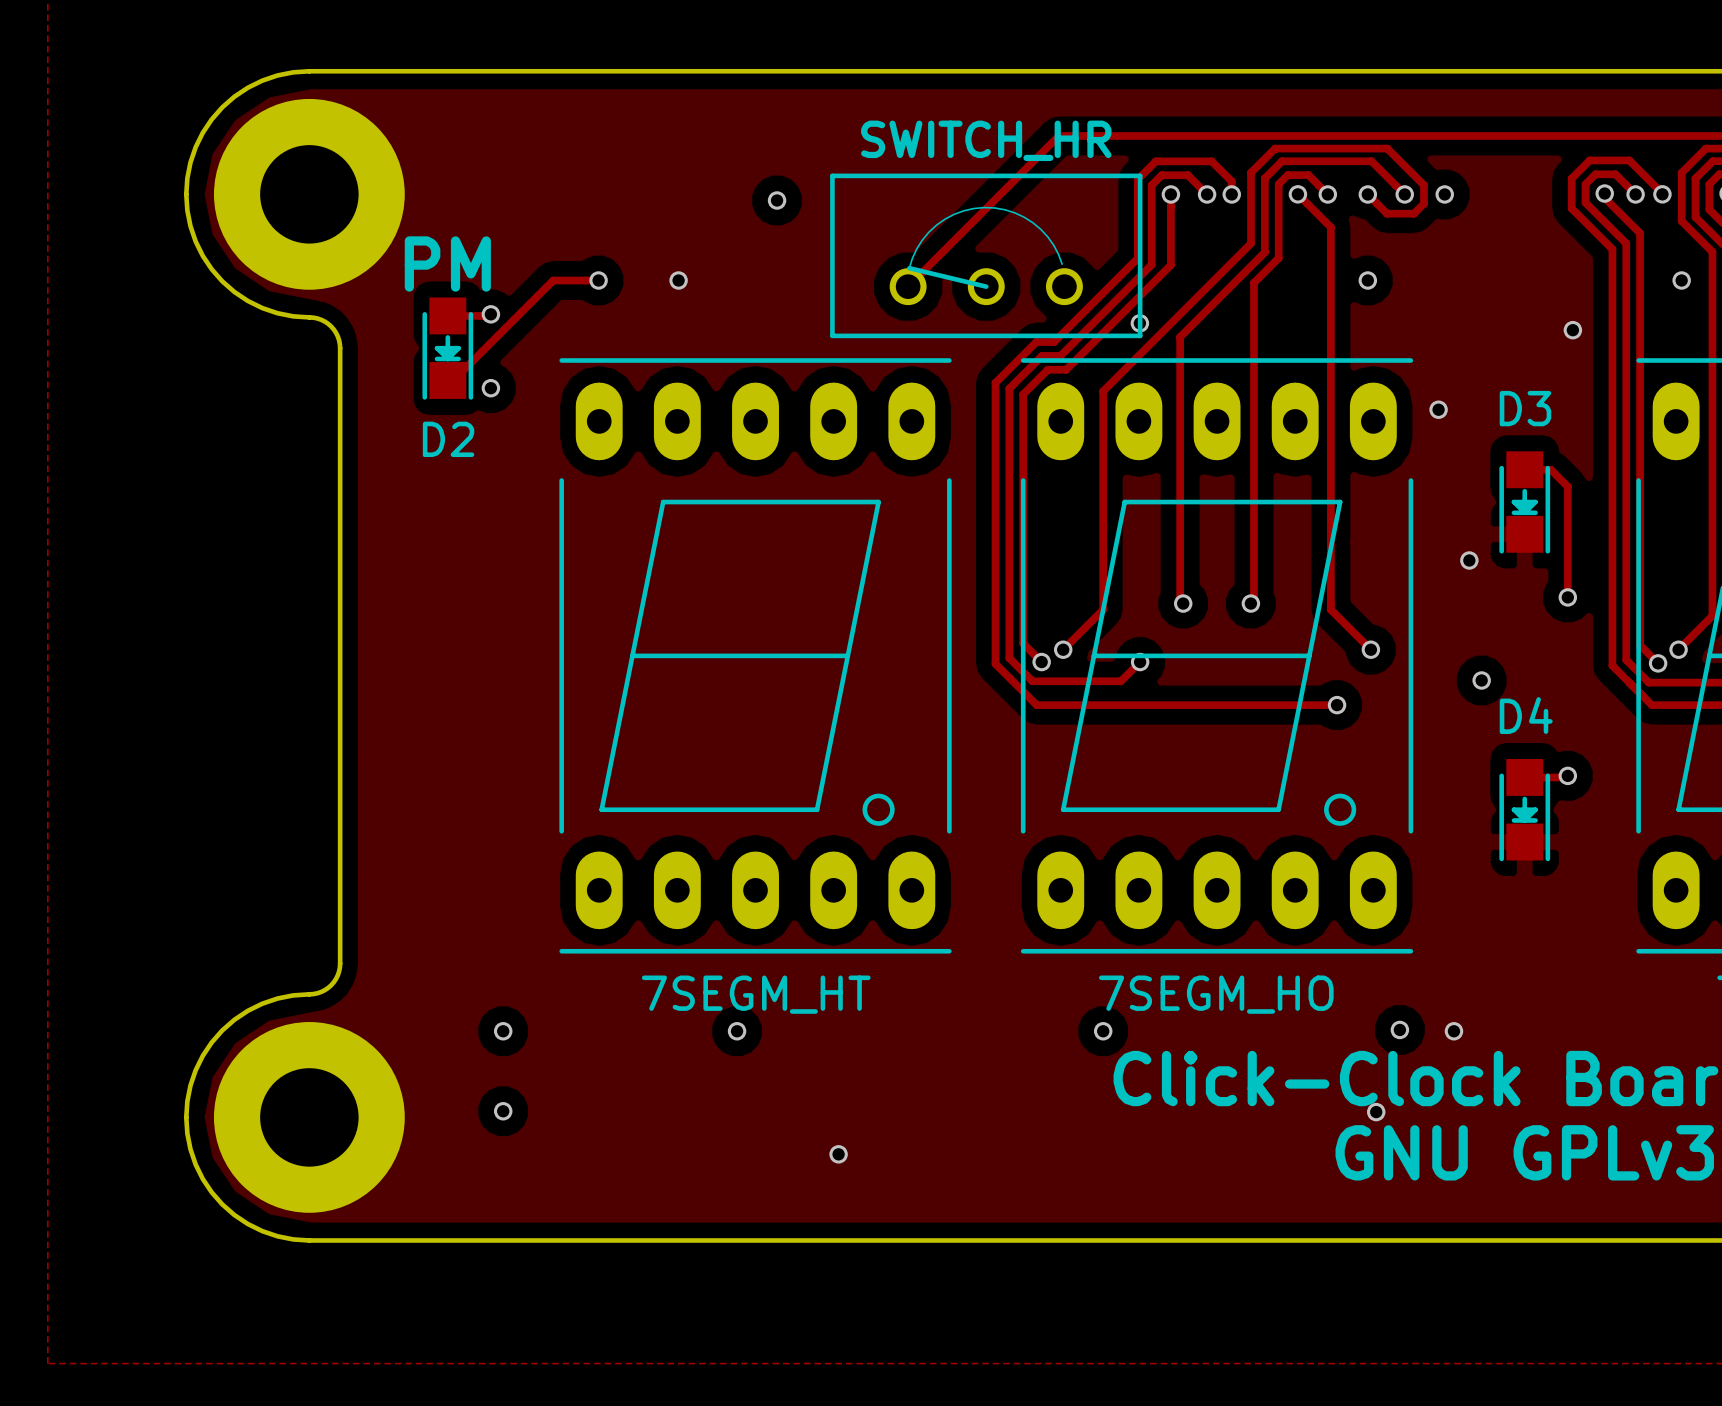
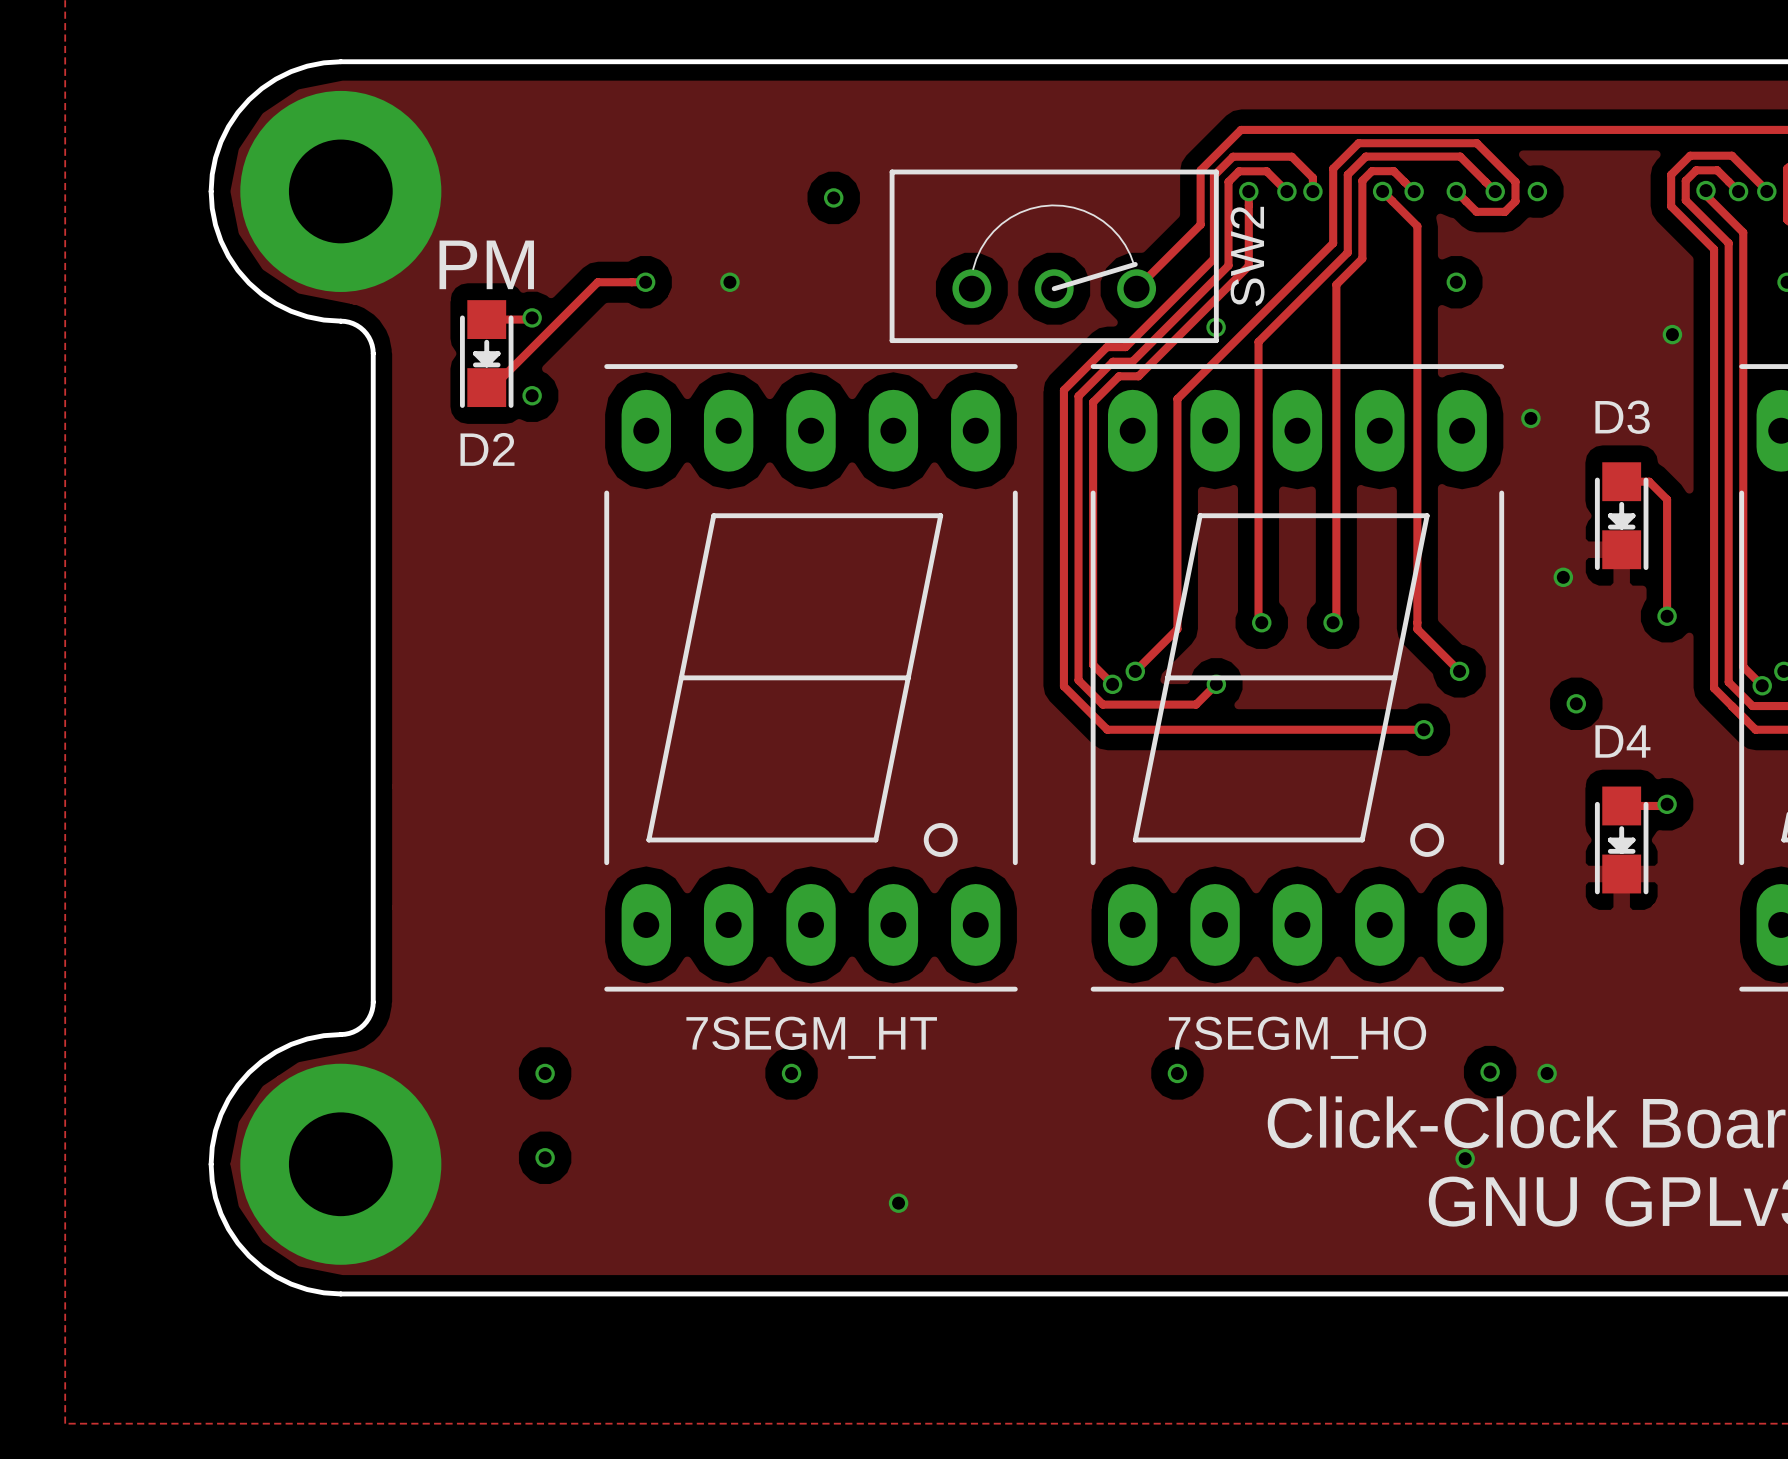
track: (1163, 135) (1058, 135) (908, 286) -> (1241, 129) (1200, 170) (1200, 224) (1136, 288)
part: SWITCH_HR (986, 255) -> none
SW2: none -> (1054, 256)

